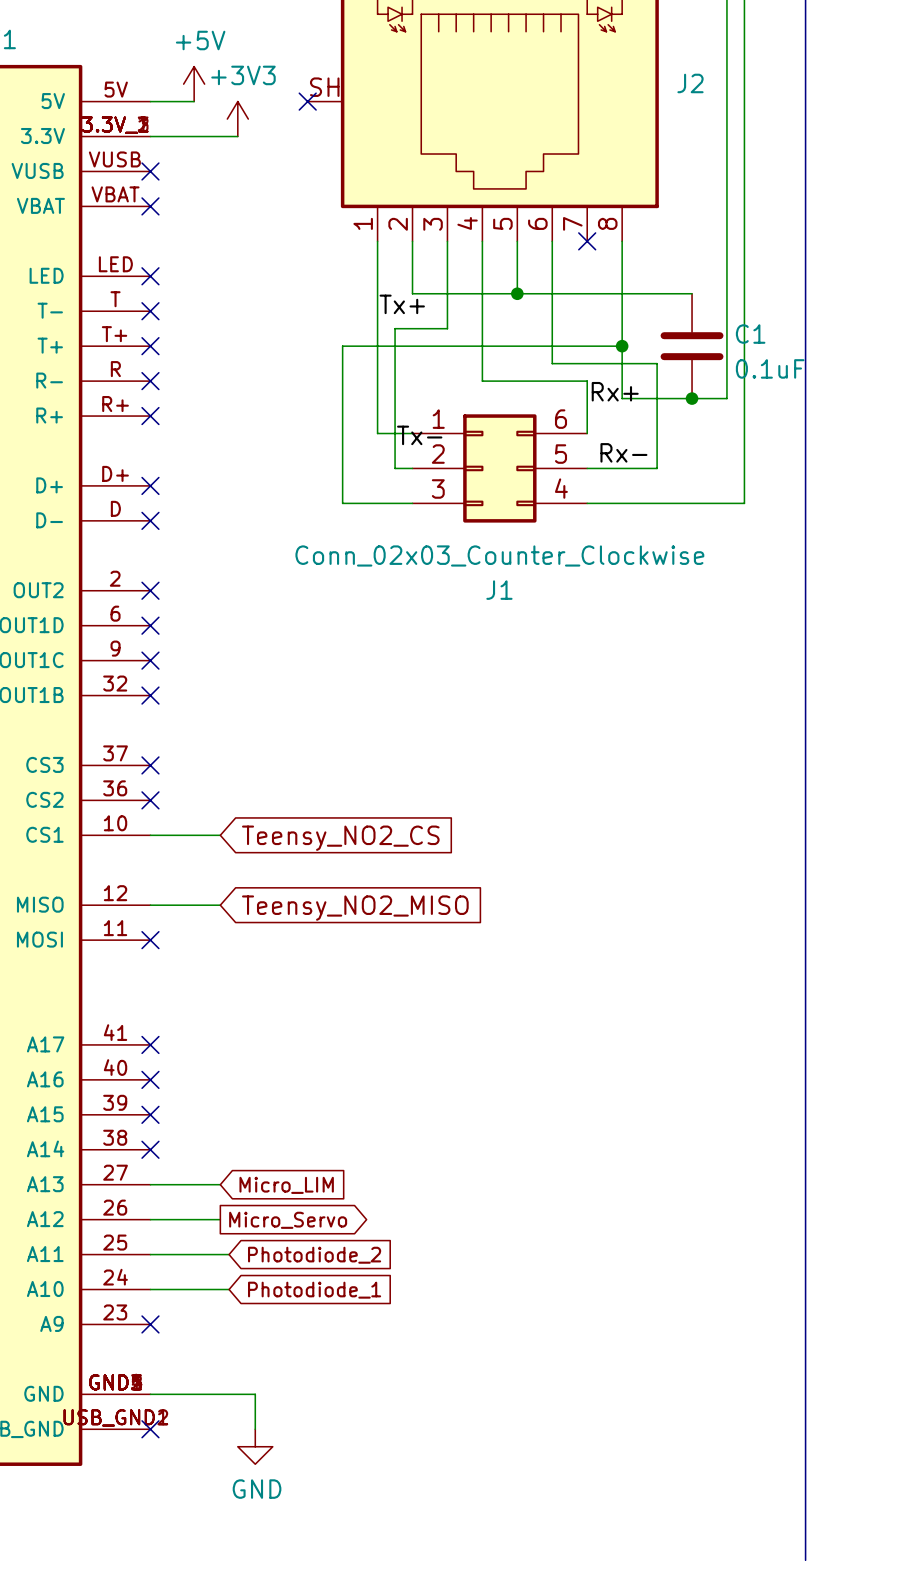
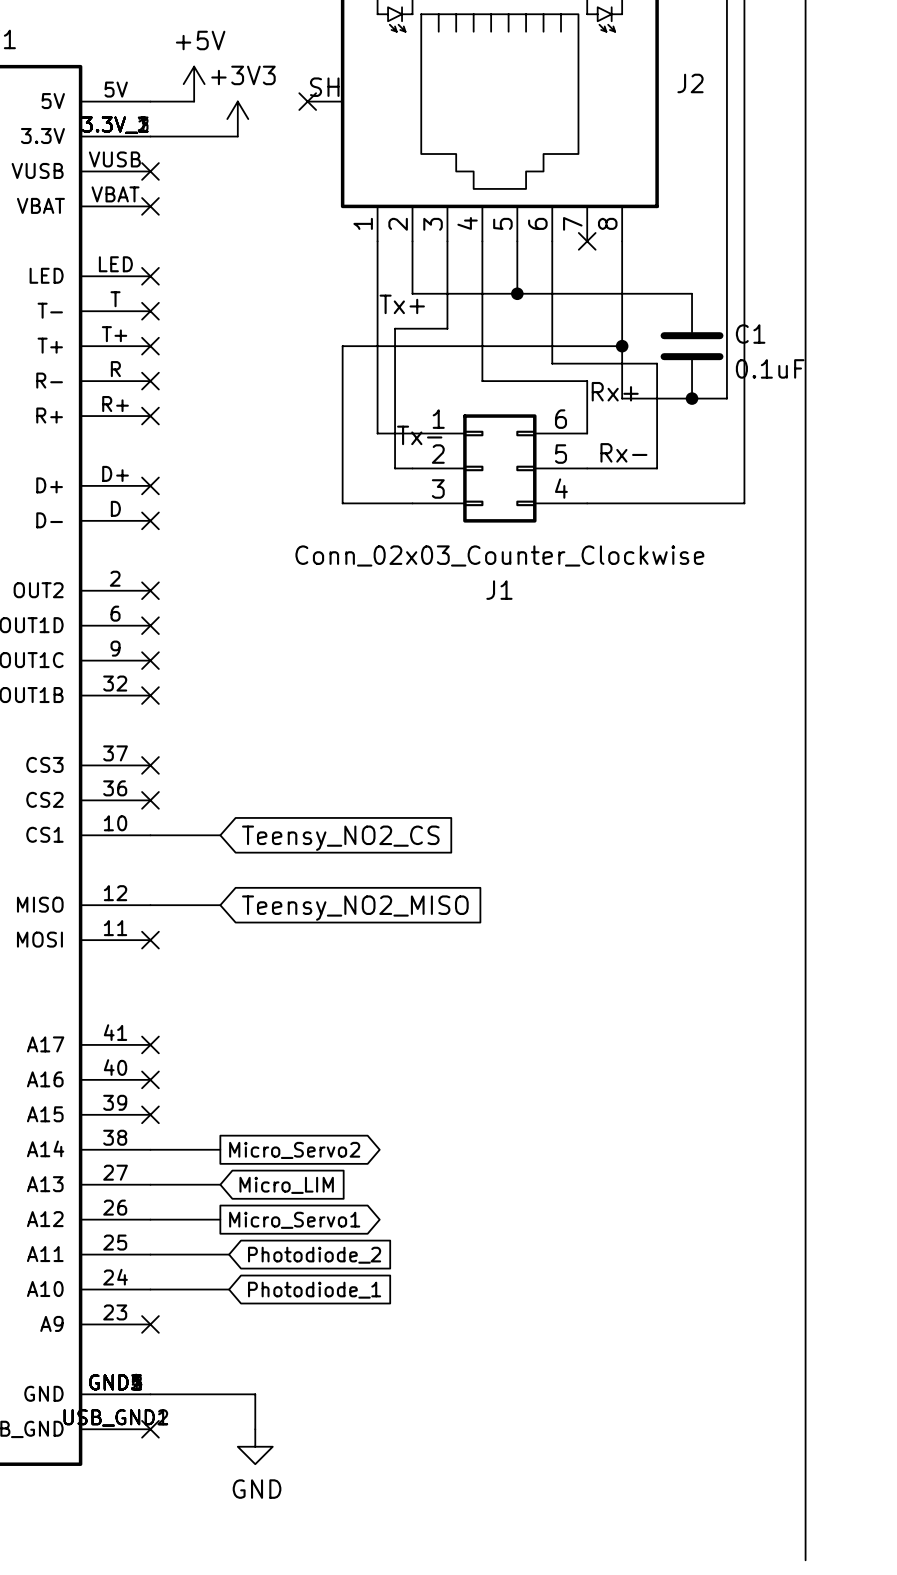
wire: none -> (150, 1149) (220, 1149)
no-connect mark: (150, 1149) -> none
global label: none -> Micro_Servo2 (294, 1150)
global label: Micro_Servo (288, 1220) -> Micro_Servo1 (294, 1220)

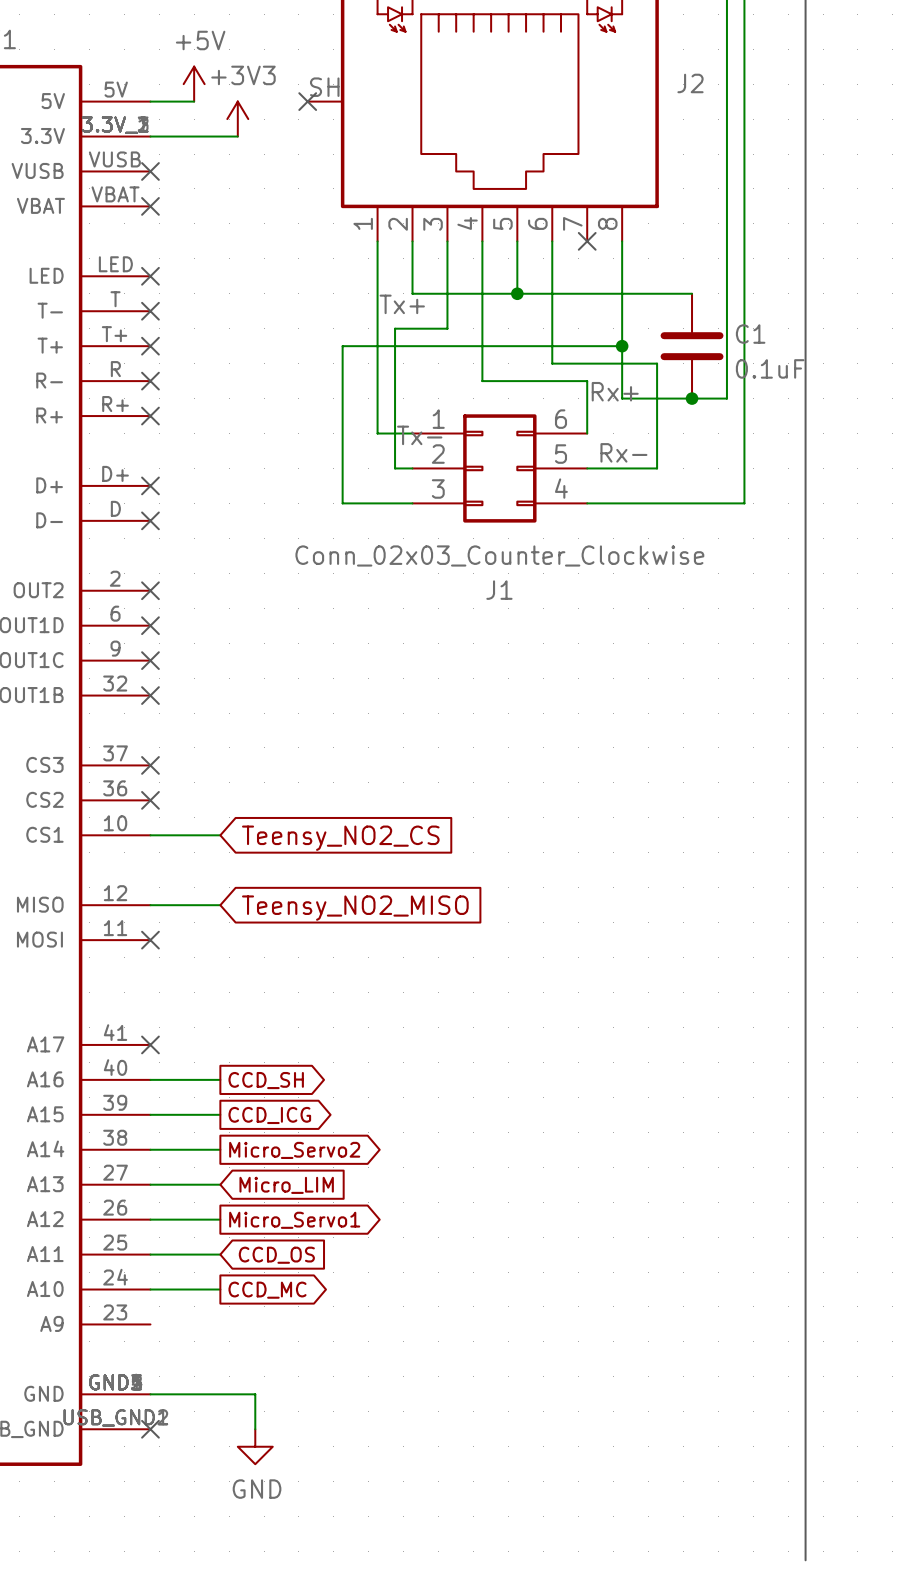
wire: none -> (150, 1079) (220, 1079)
no-connect mark: (150, 1079) -> none
global label: none -> CCD_SH (266, 1080)
wire: none -> (150, 1114) (220, 1114)
no-connect mark: (150, 1114) -> none
global label: none -> CCD_ICG (269, 1115)
wire: (220, 1254) (229, 1254) -> none
global label: Photodiode_2 (314, 1255) -> CCD_OS (276, 1255)
wire: (220, 1289) (229, 1289) -> none
global label shape: input (314, 1290) -> output (267, 1290)
global label: Photodiode_1 (314, 1290) -> CCD_MC (267, 1290)
no-connect mark: (150, 1324) -> none

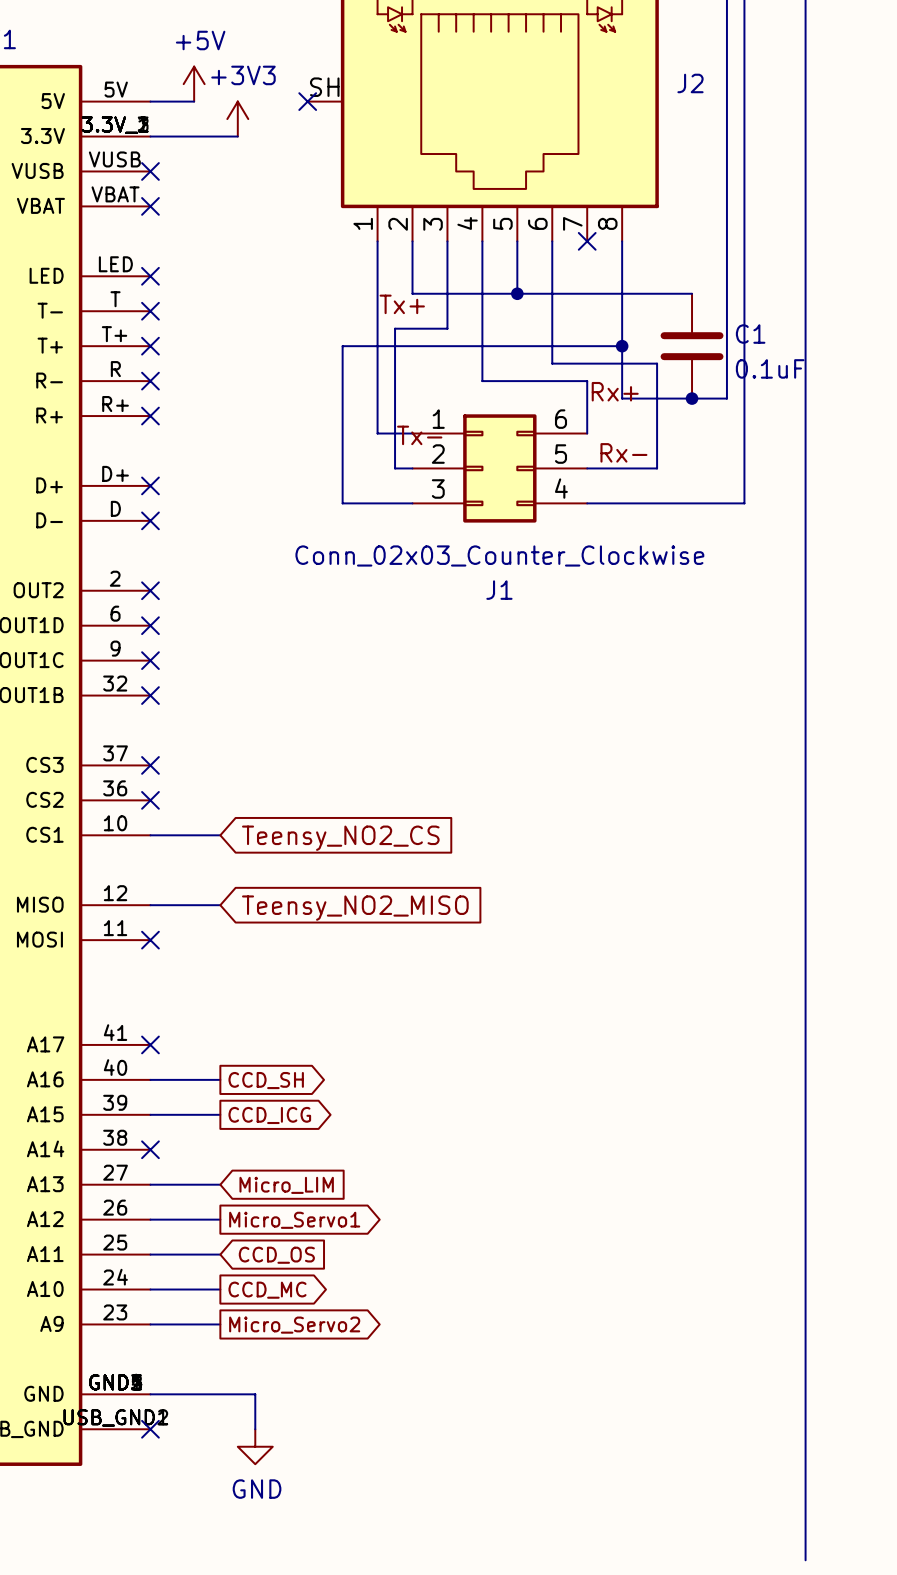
wire: (150, 1149) (220, 1149) -> (150, 1324) (220, 1324)
no-connect mark: none -> (150, 1149)
global label position: Micro_Servo2 (294, 1150) -> Micro_Servo2 (294, 1325)

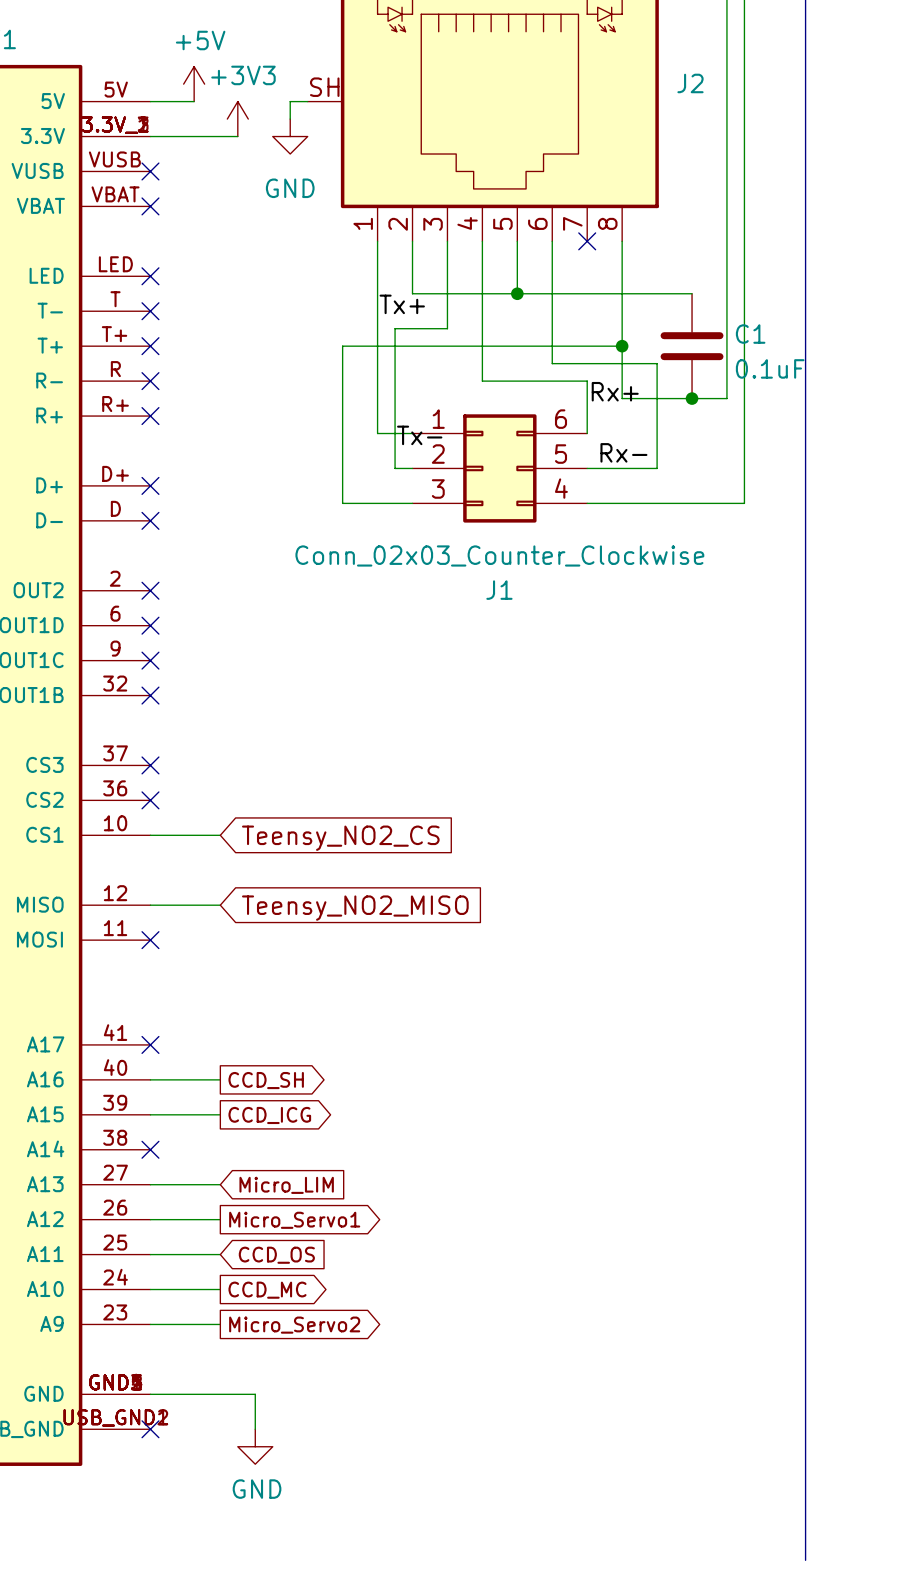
wire: none -> (307, 101) (290, 101) (290, 119)
no-connect mark: (307, 101) -> none
power symbol: none -> GND (290, 136)

